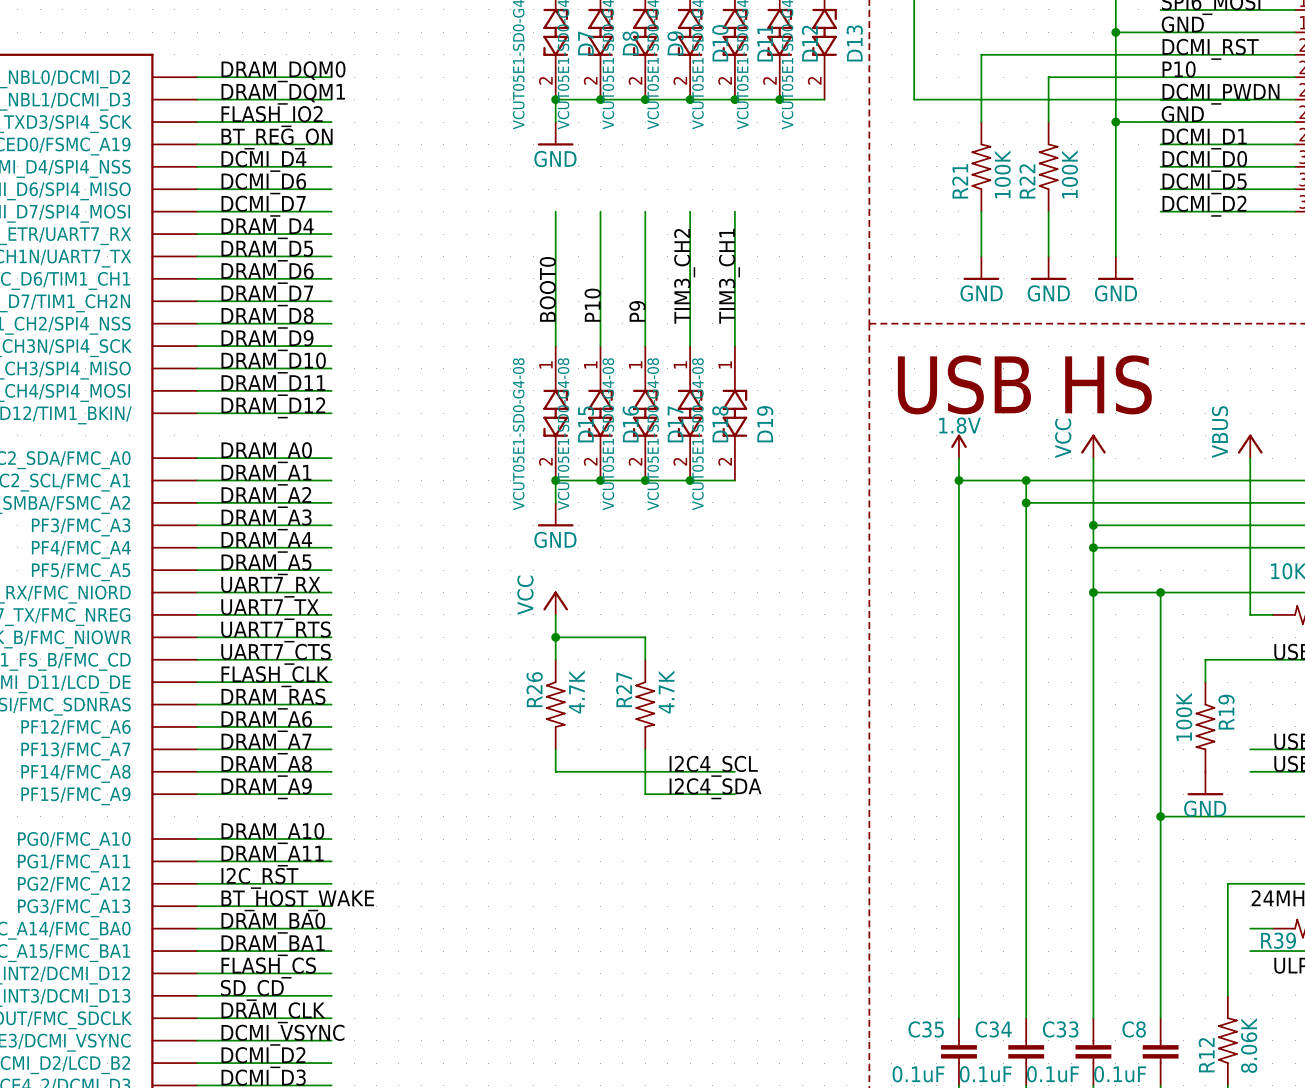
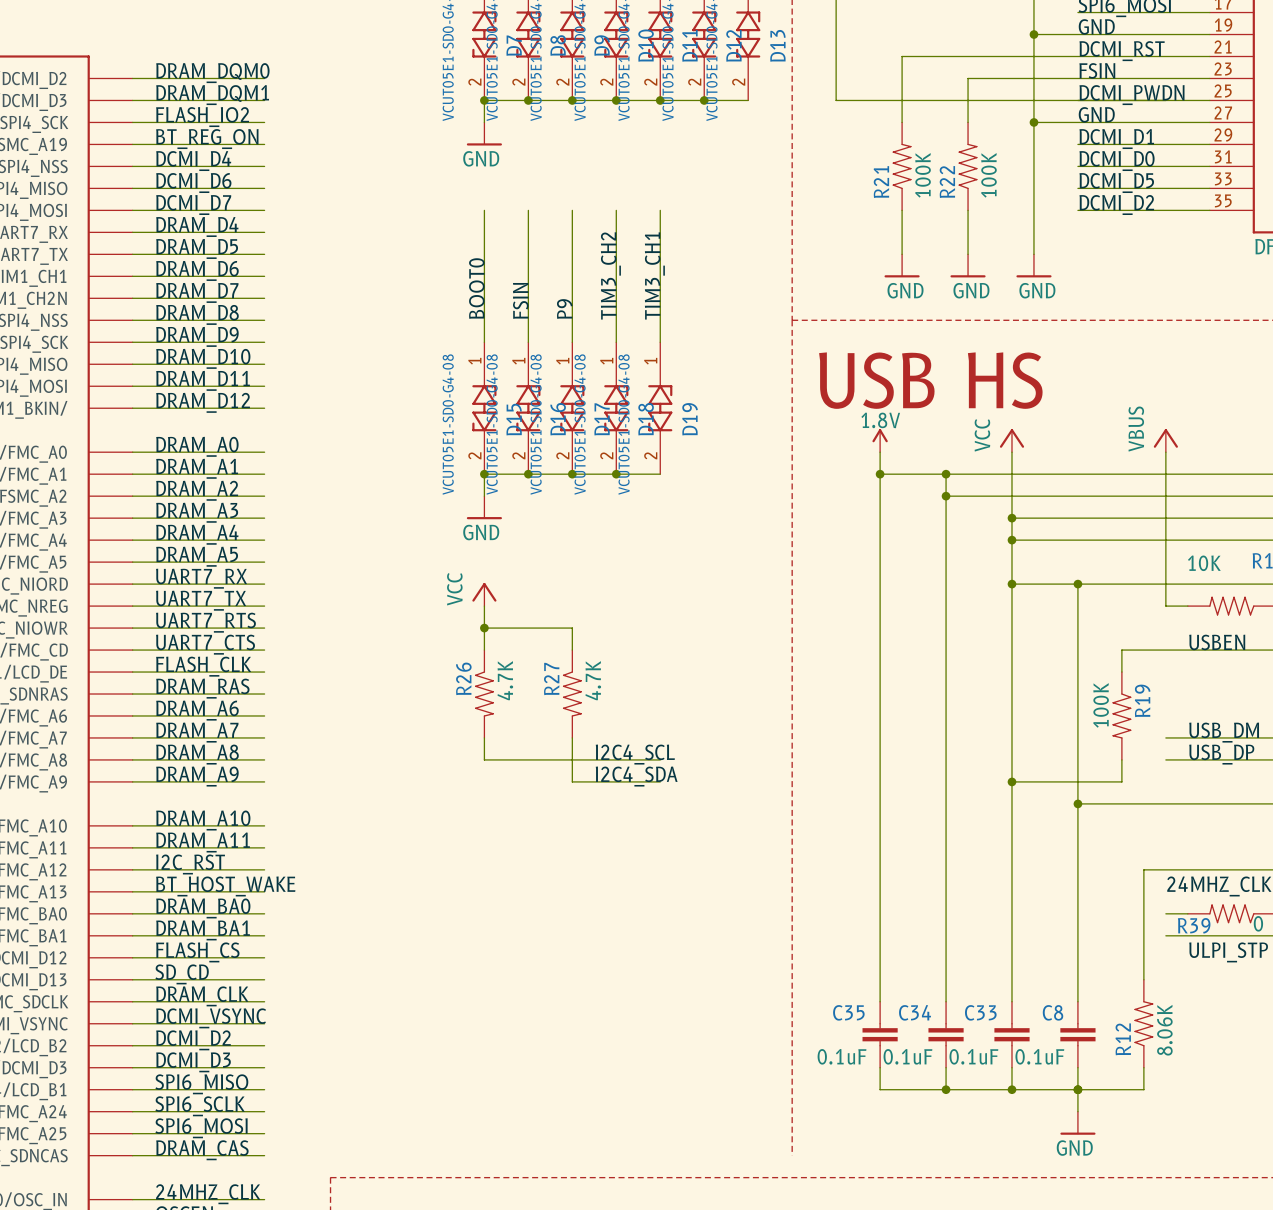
label: P10 (1179, 69) -> FSIN (1097, 70)
label: P10 (592, 305) -> FSIN (520, 300)
wire: none -> (1121, 759) (1121, 781) (1011, 781)
power symbol: GND (1205, 783) -> none
junction: none -> (1011, 781)

